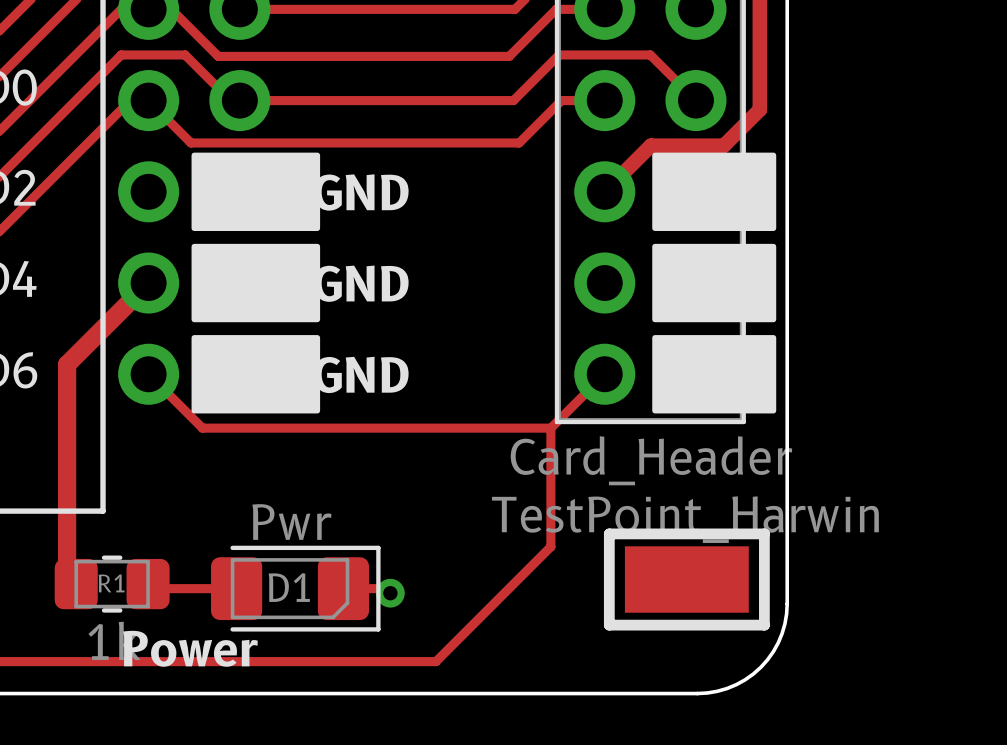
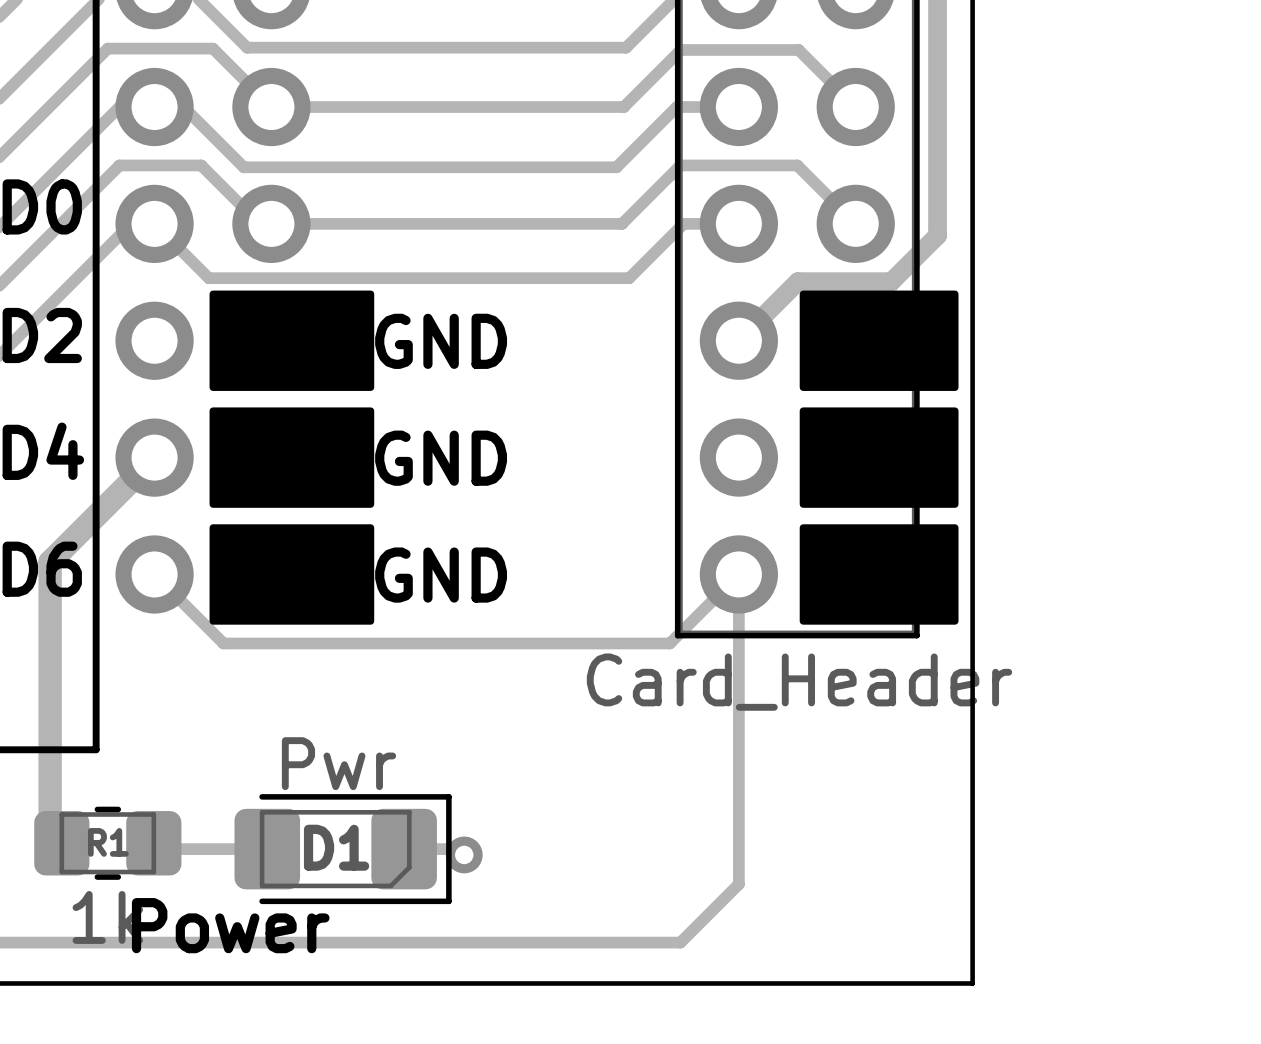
track: (550, 428) (550, 546) (435, 661) -> (738, 574) (738, 884) (680, 942) (522, 942)
line: (609, 533) (764, 533) (764, 625) (609, 625) (609, 533) -> none
part: TestPoint_Harwin (686, 579) -> none
board edge: (787, 603) (784, 623) (778, 642) (760, 667) (745, 679) (727, 688) (697, 693) -> (972, 868) (972, 983) (857, 983)

